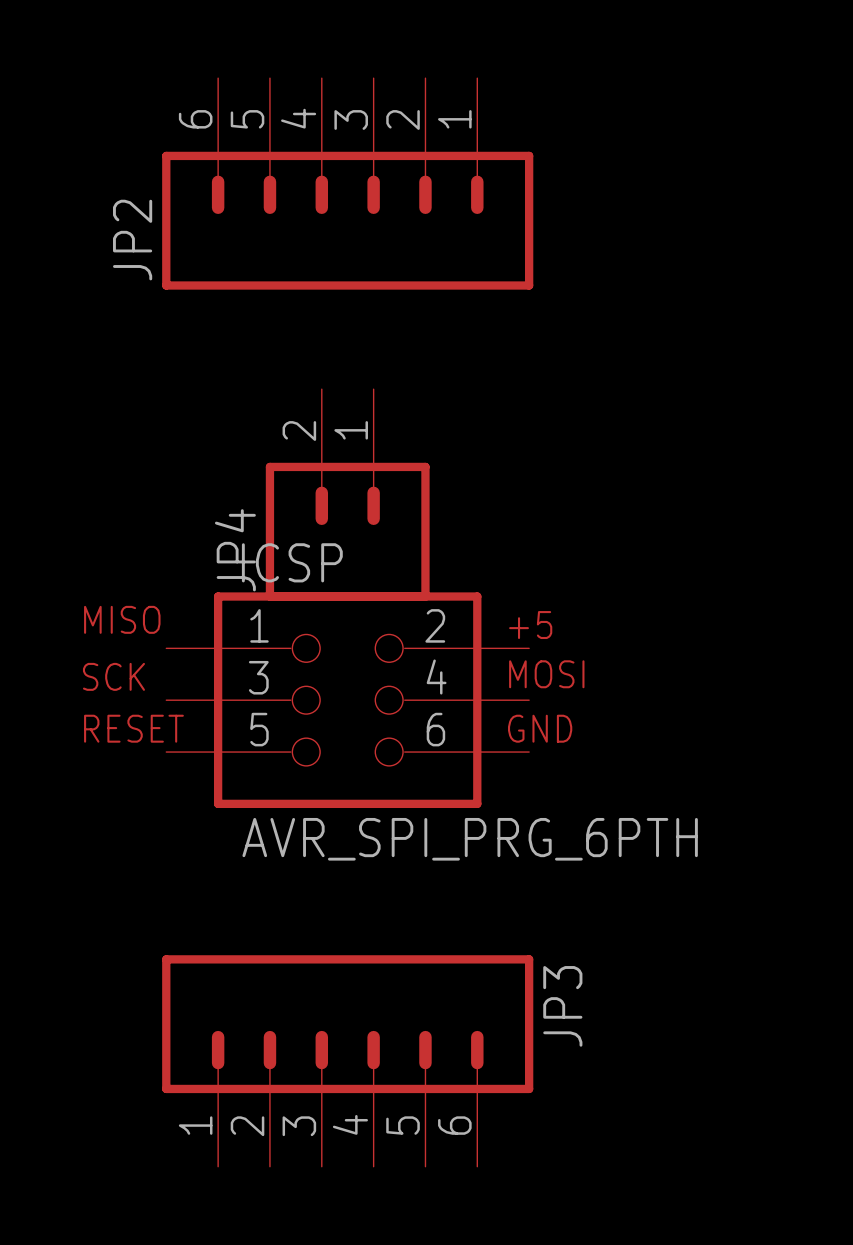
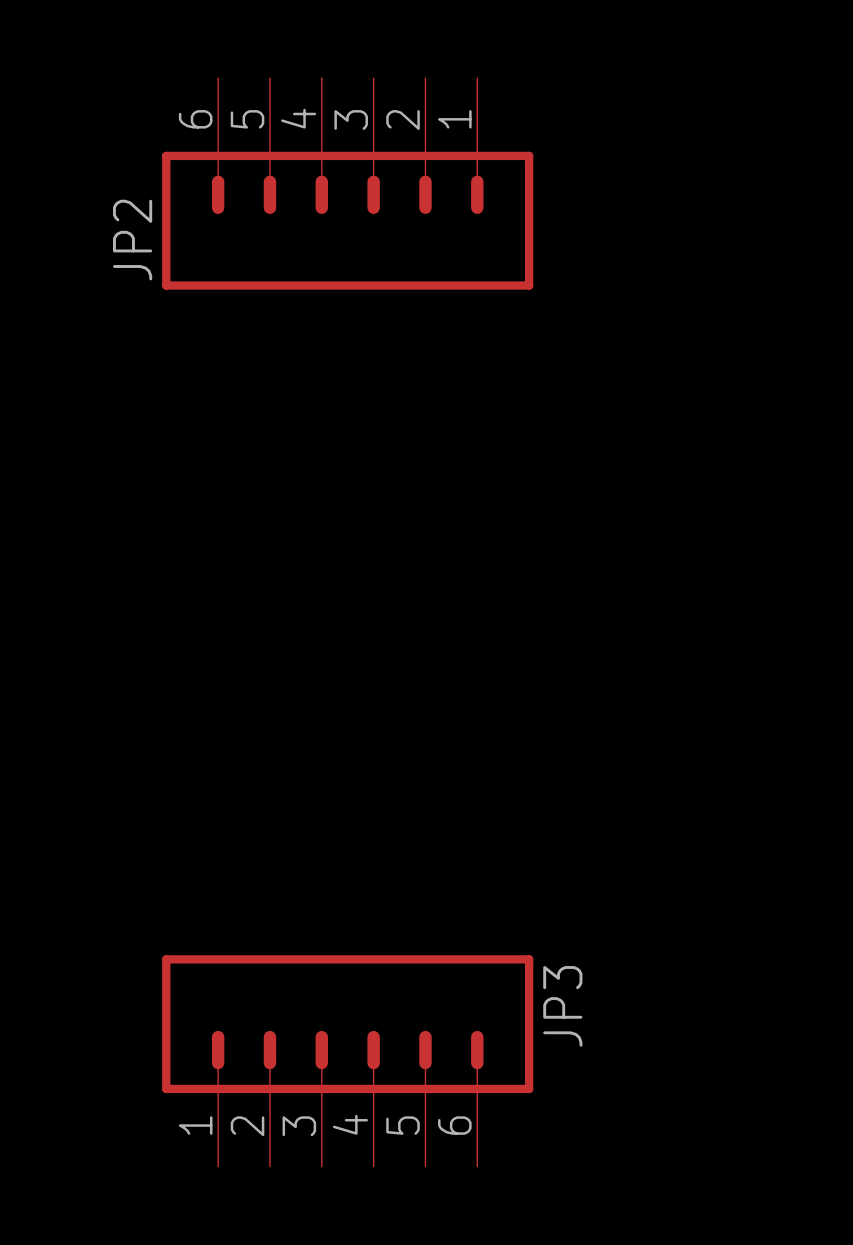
JP4: (347, 494) -> none
ICSP: AVR_SPI_PRG_6PTH (347, 700) -> none

